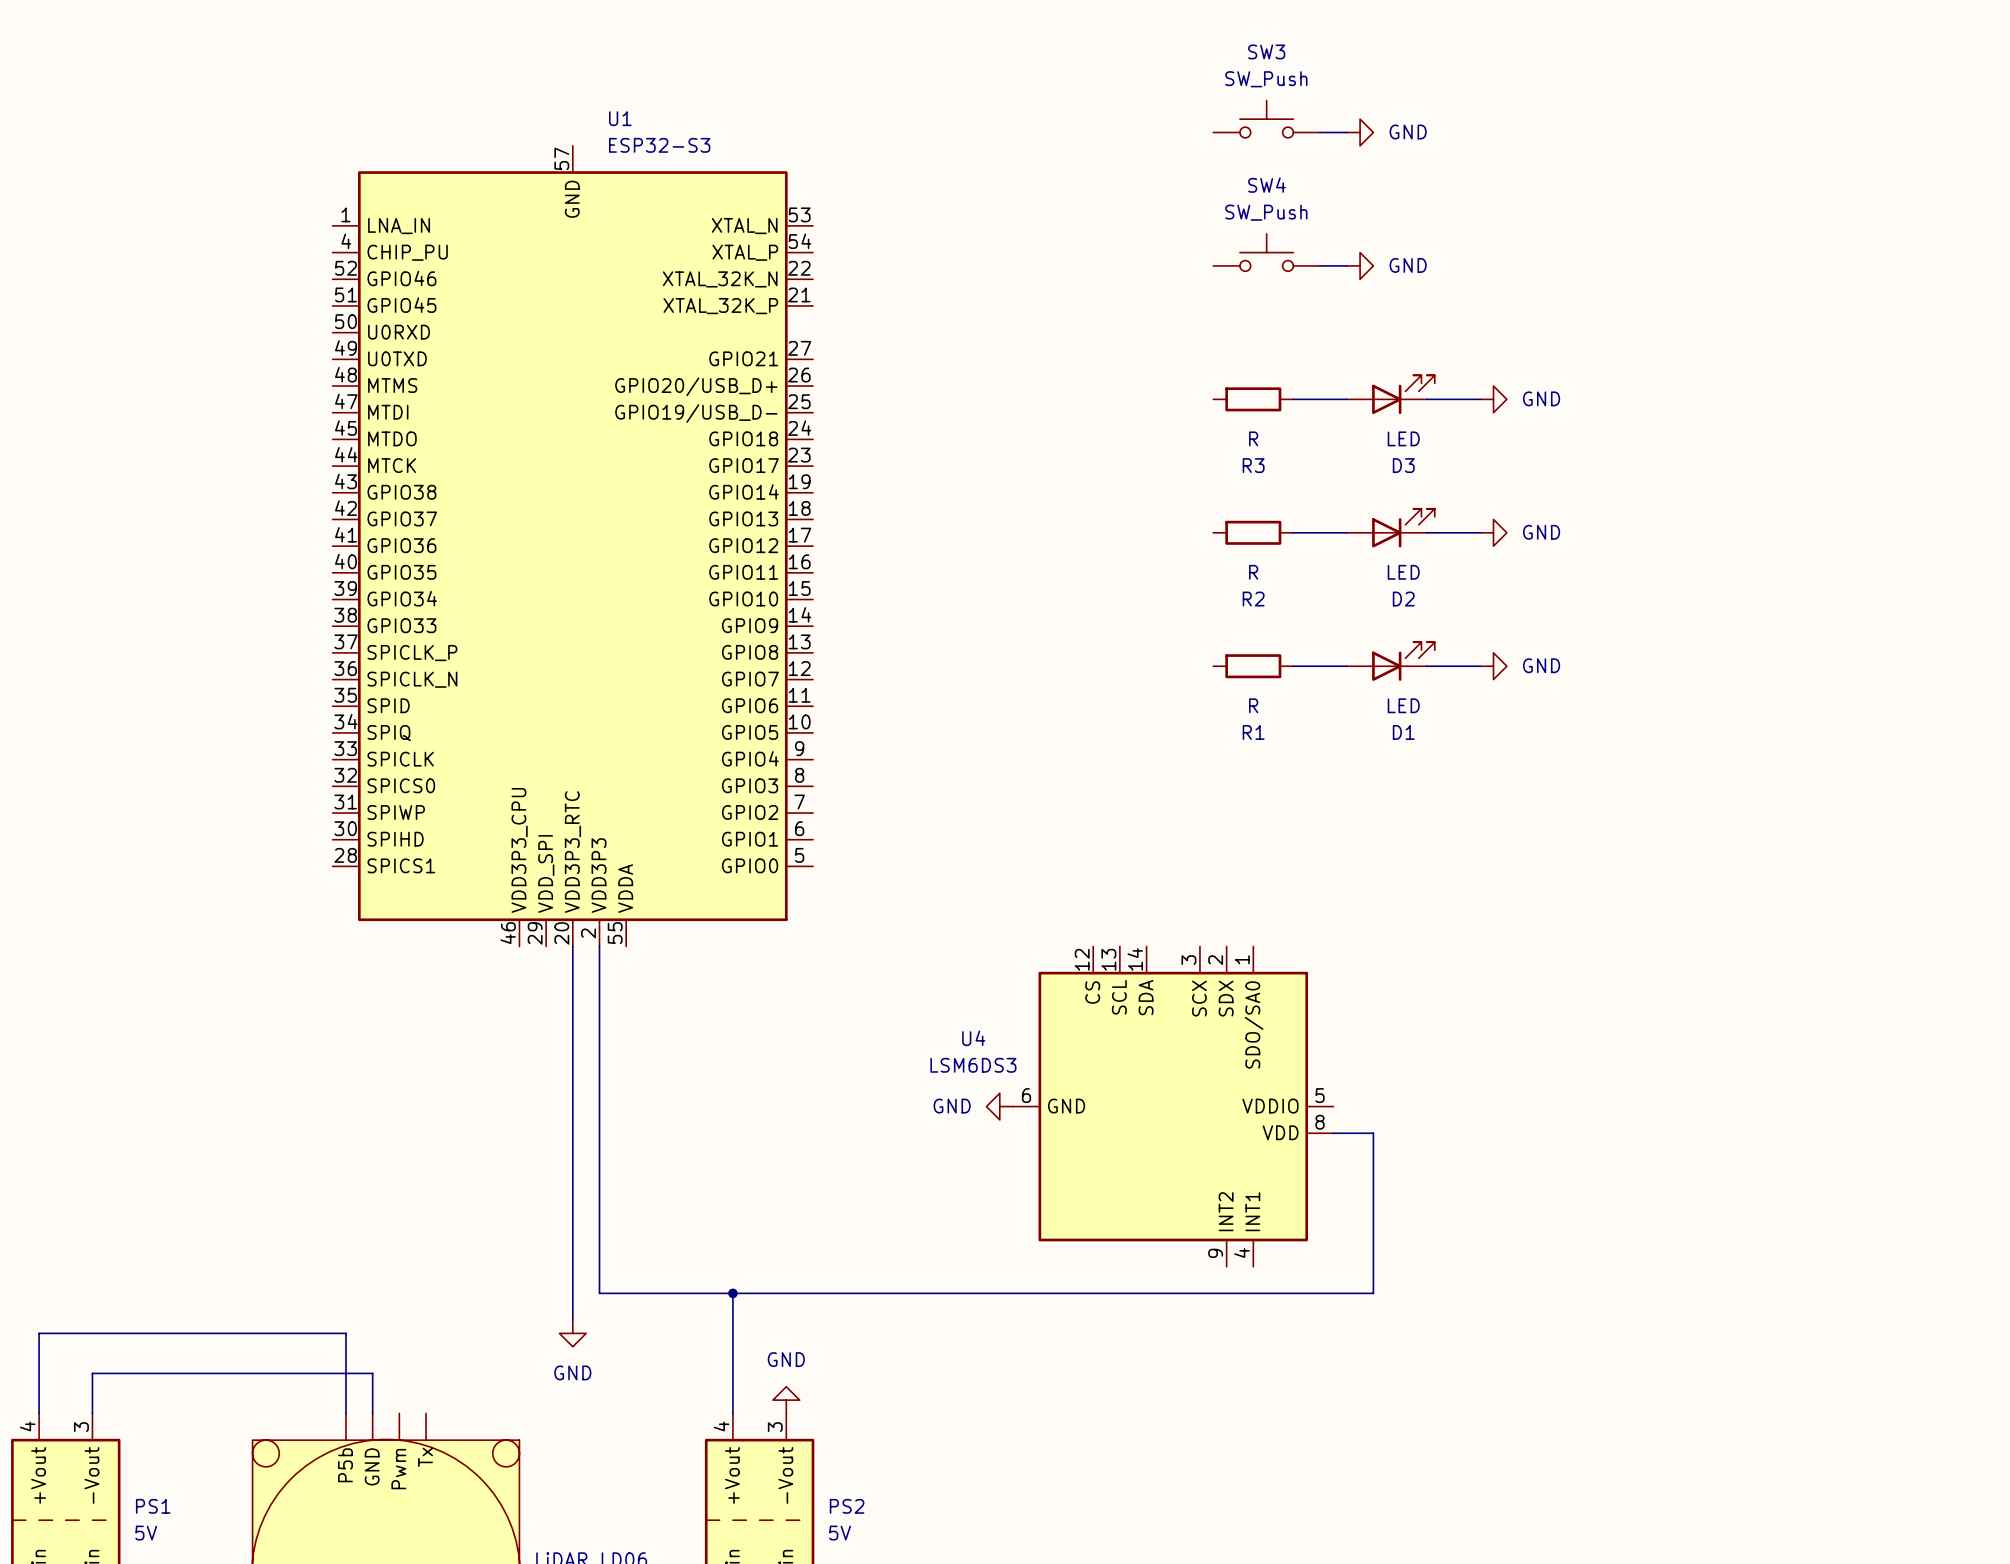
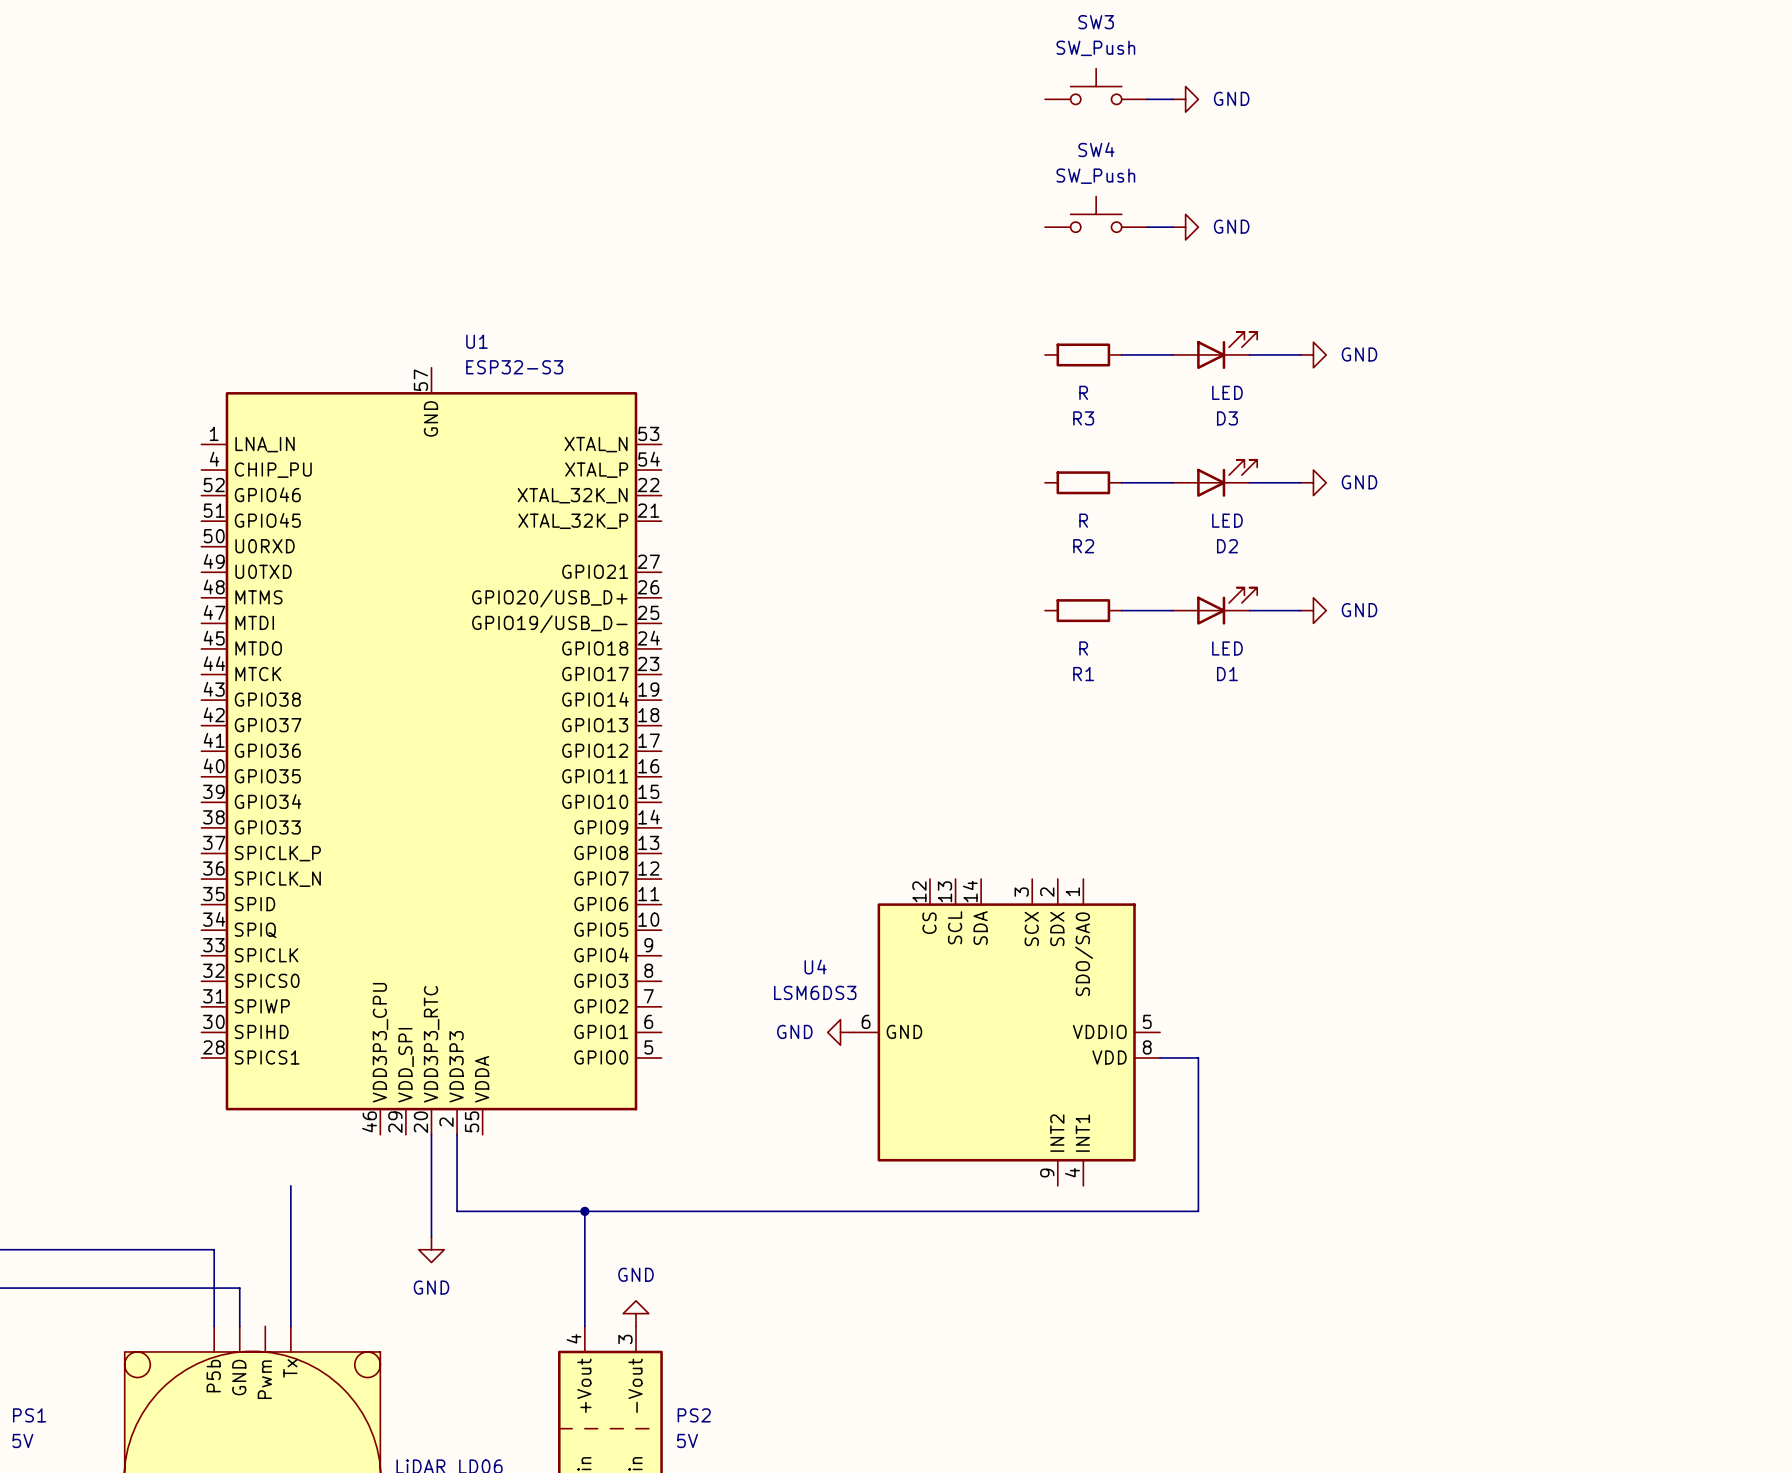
U1 position: (572, 546) -> (431, 751)
wire: none -> (290, 1185) (290, 1326)

